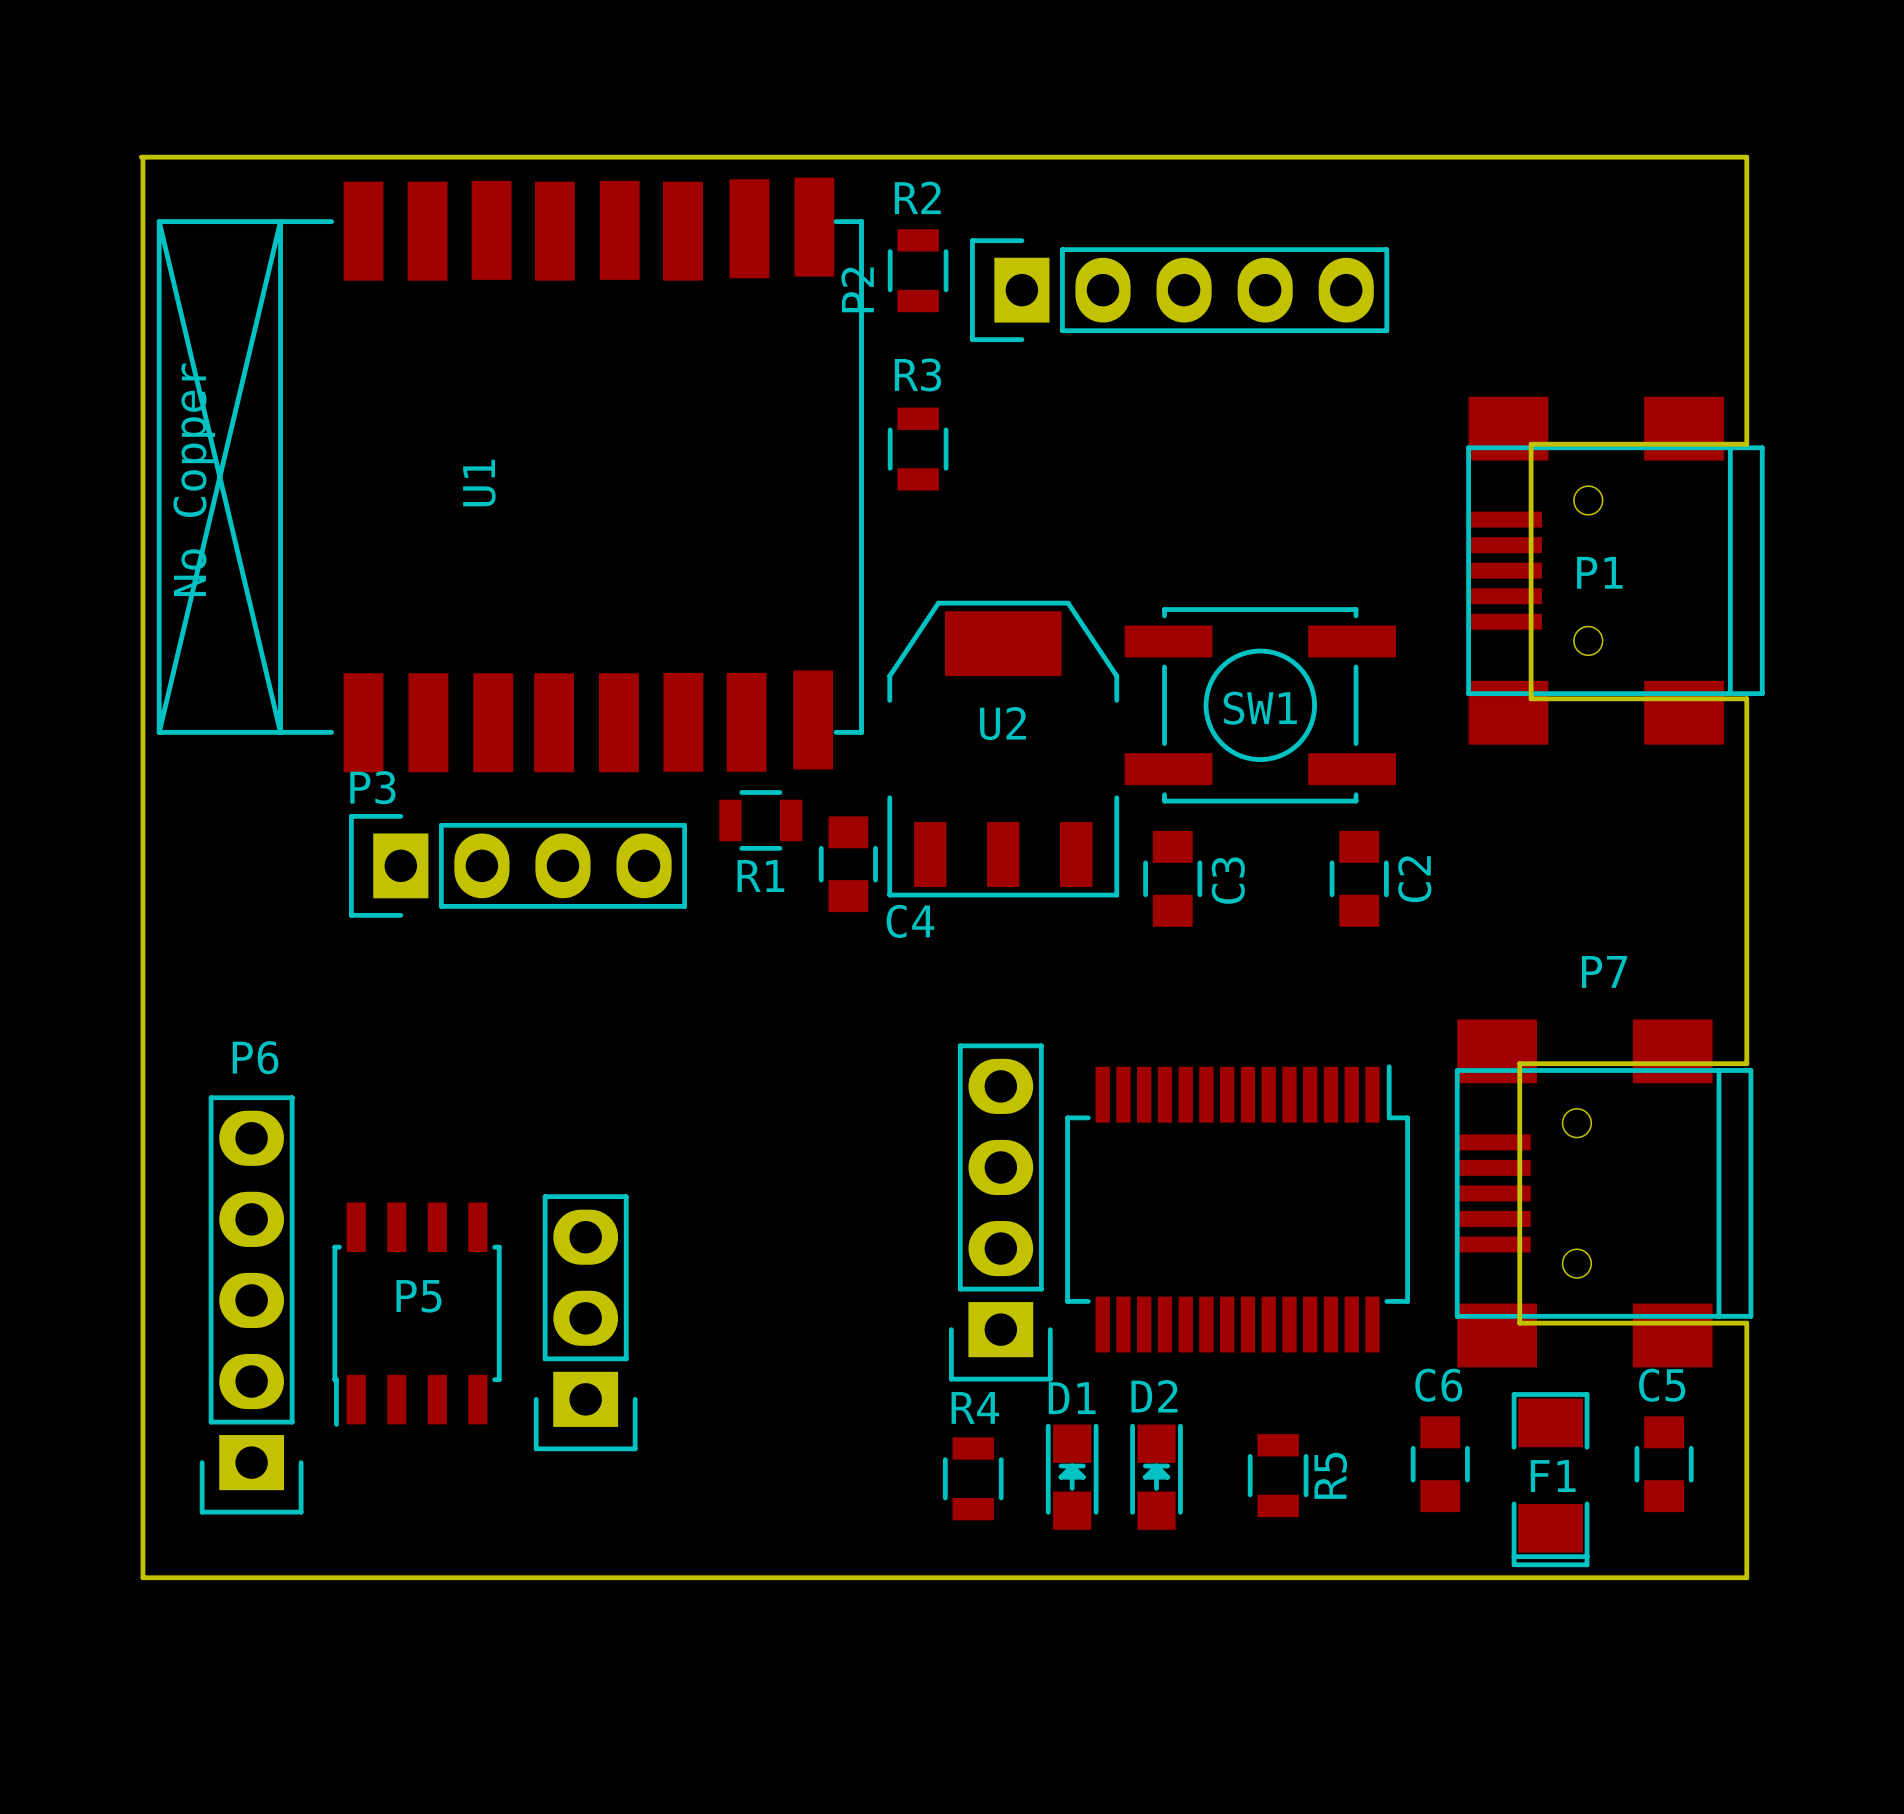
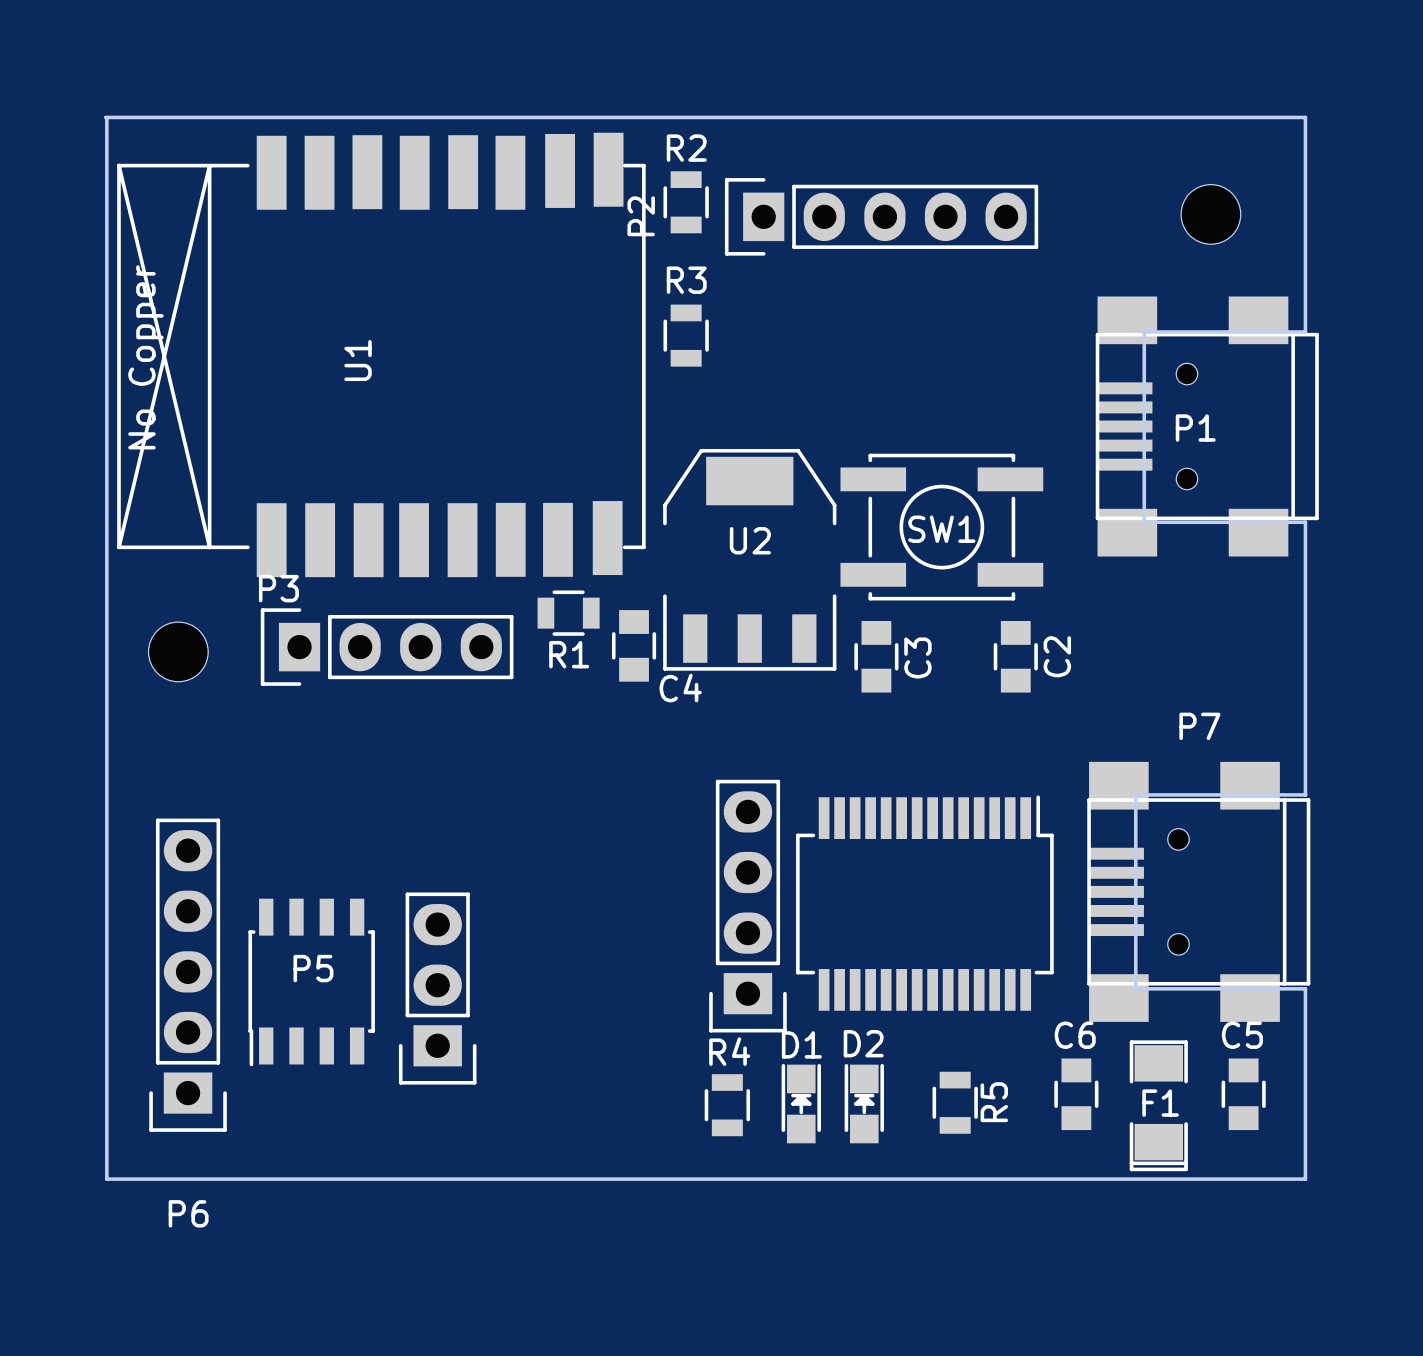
part: none -> (1210, 214)
part: none -> (178, 651)
P6 name position: P6 (255, 1057) -> P6 (188, 1213)

